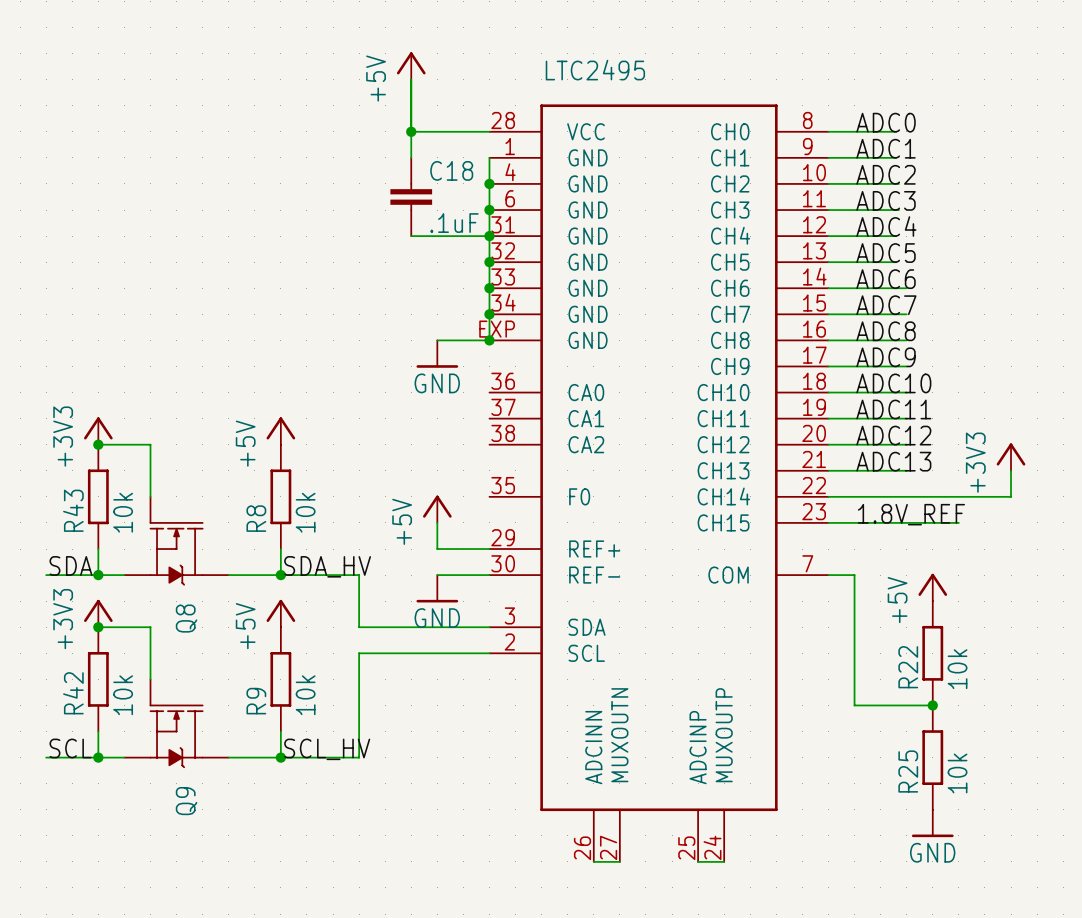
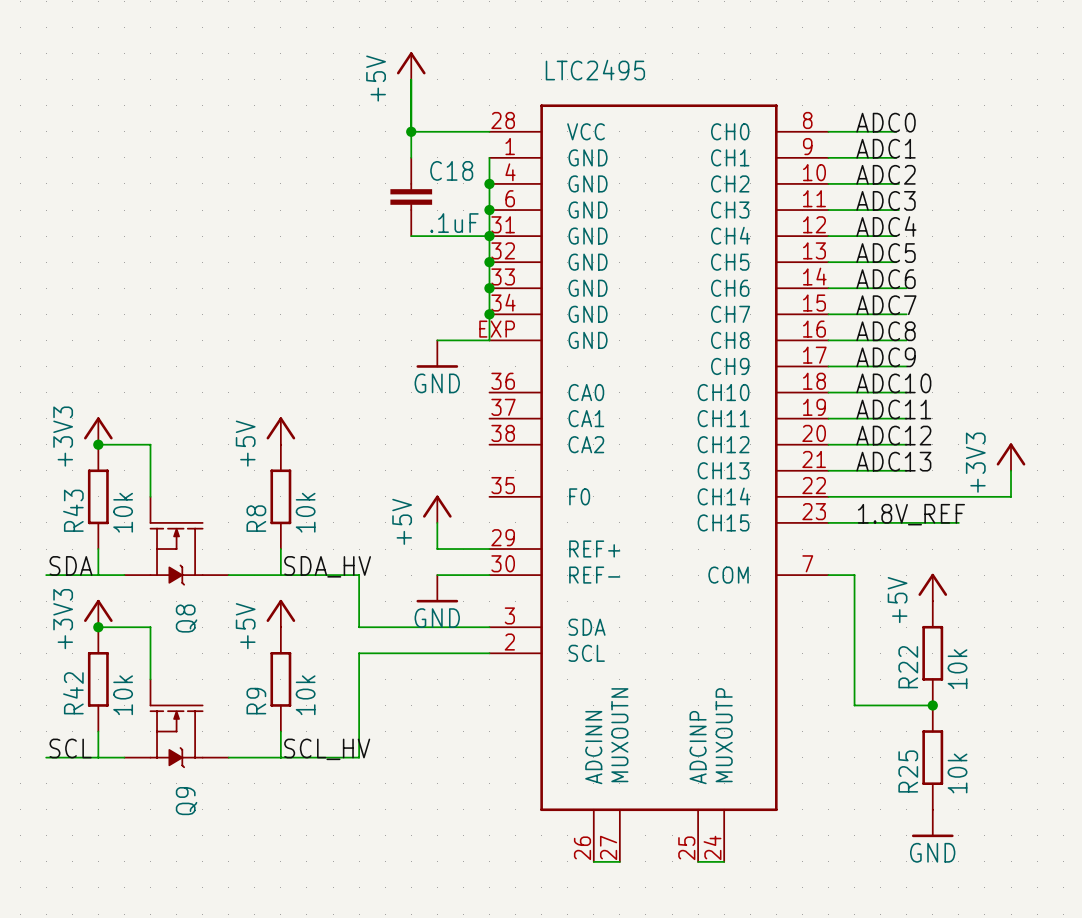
junction: (489, 340) -> none
junction: (98, 575) -> none
junction: (280, 575) -> none
junction: (98, 757) -> none
junction: (280, 757) -> none

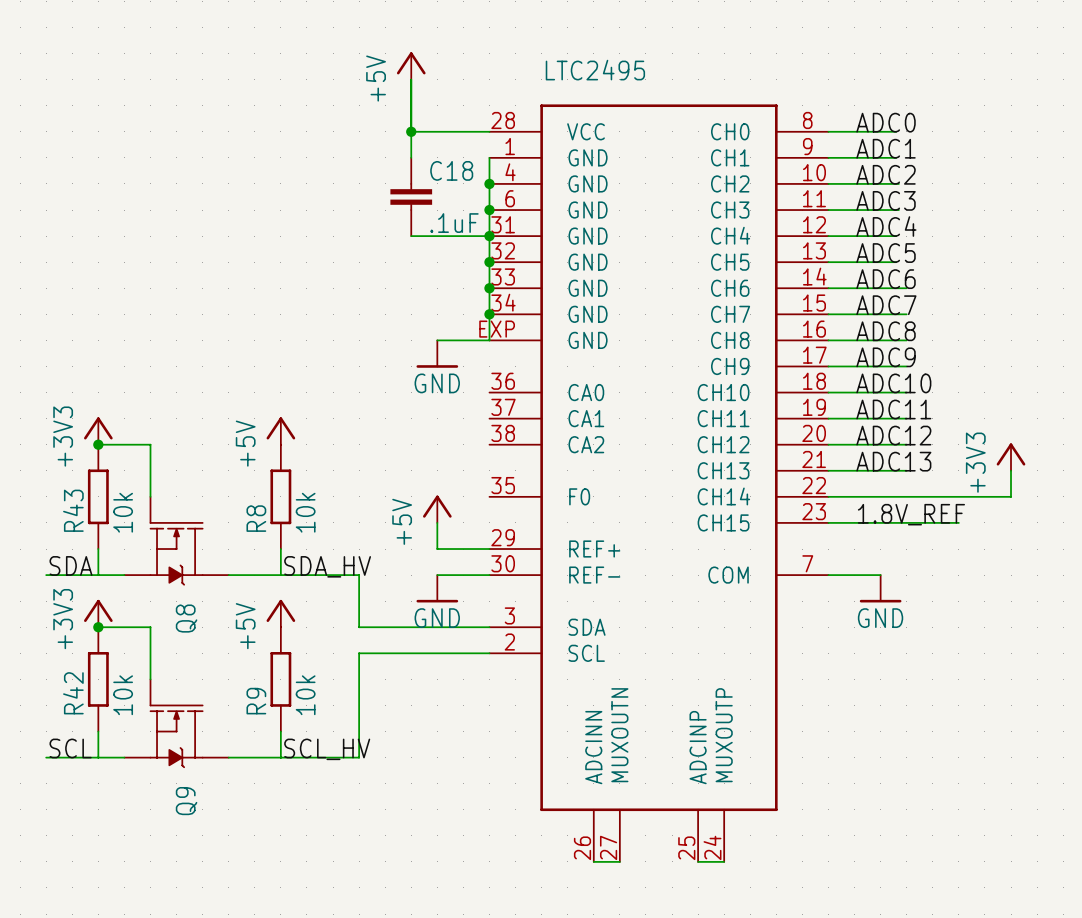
wire: (854, 575) (854, 705) (932, 705) -> (854, 575) (880, 575)
power symbol: +5V (932, 587) -> none
R22: 10k (932, 653) -> none
junction: (932, 705) -> none
R25: 10k (932, 757) -> none
power symbol position: GND (932, 823) -> GND (880, 588)

